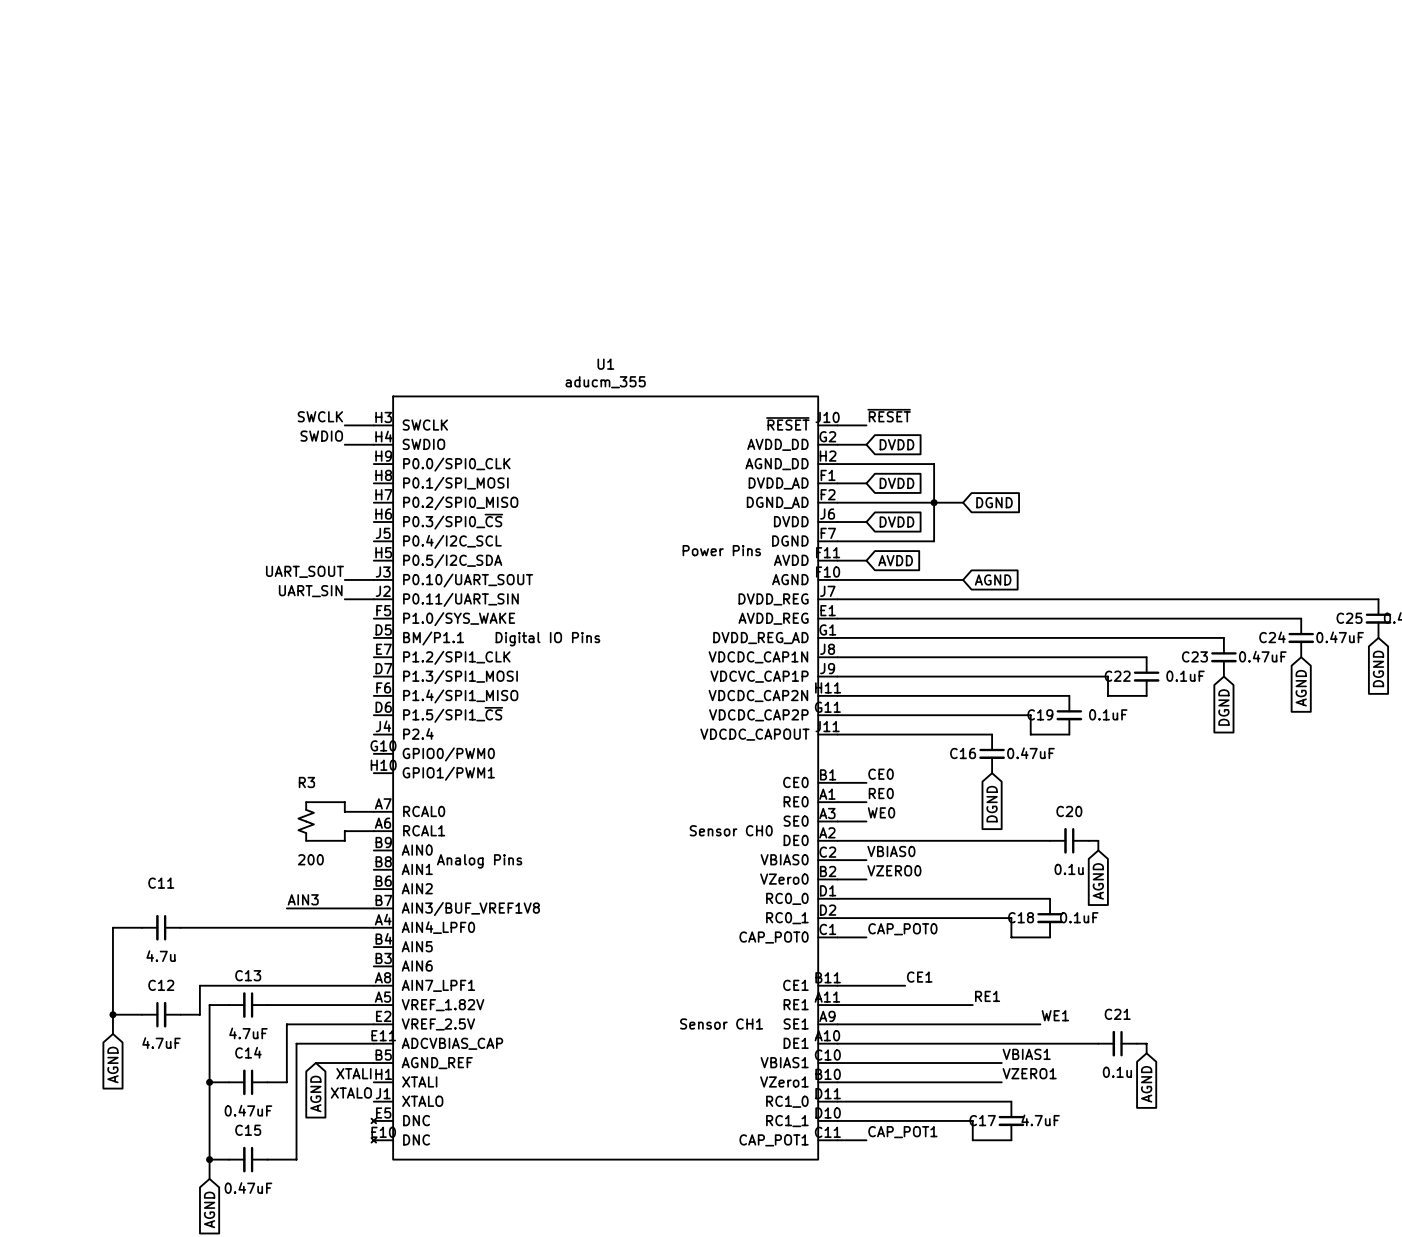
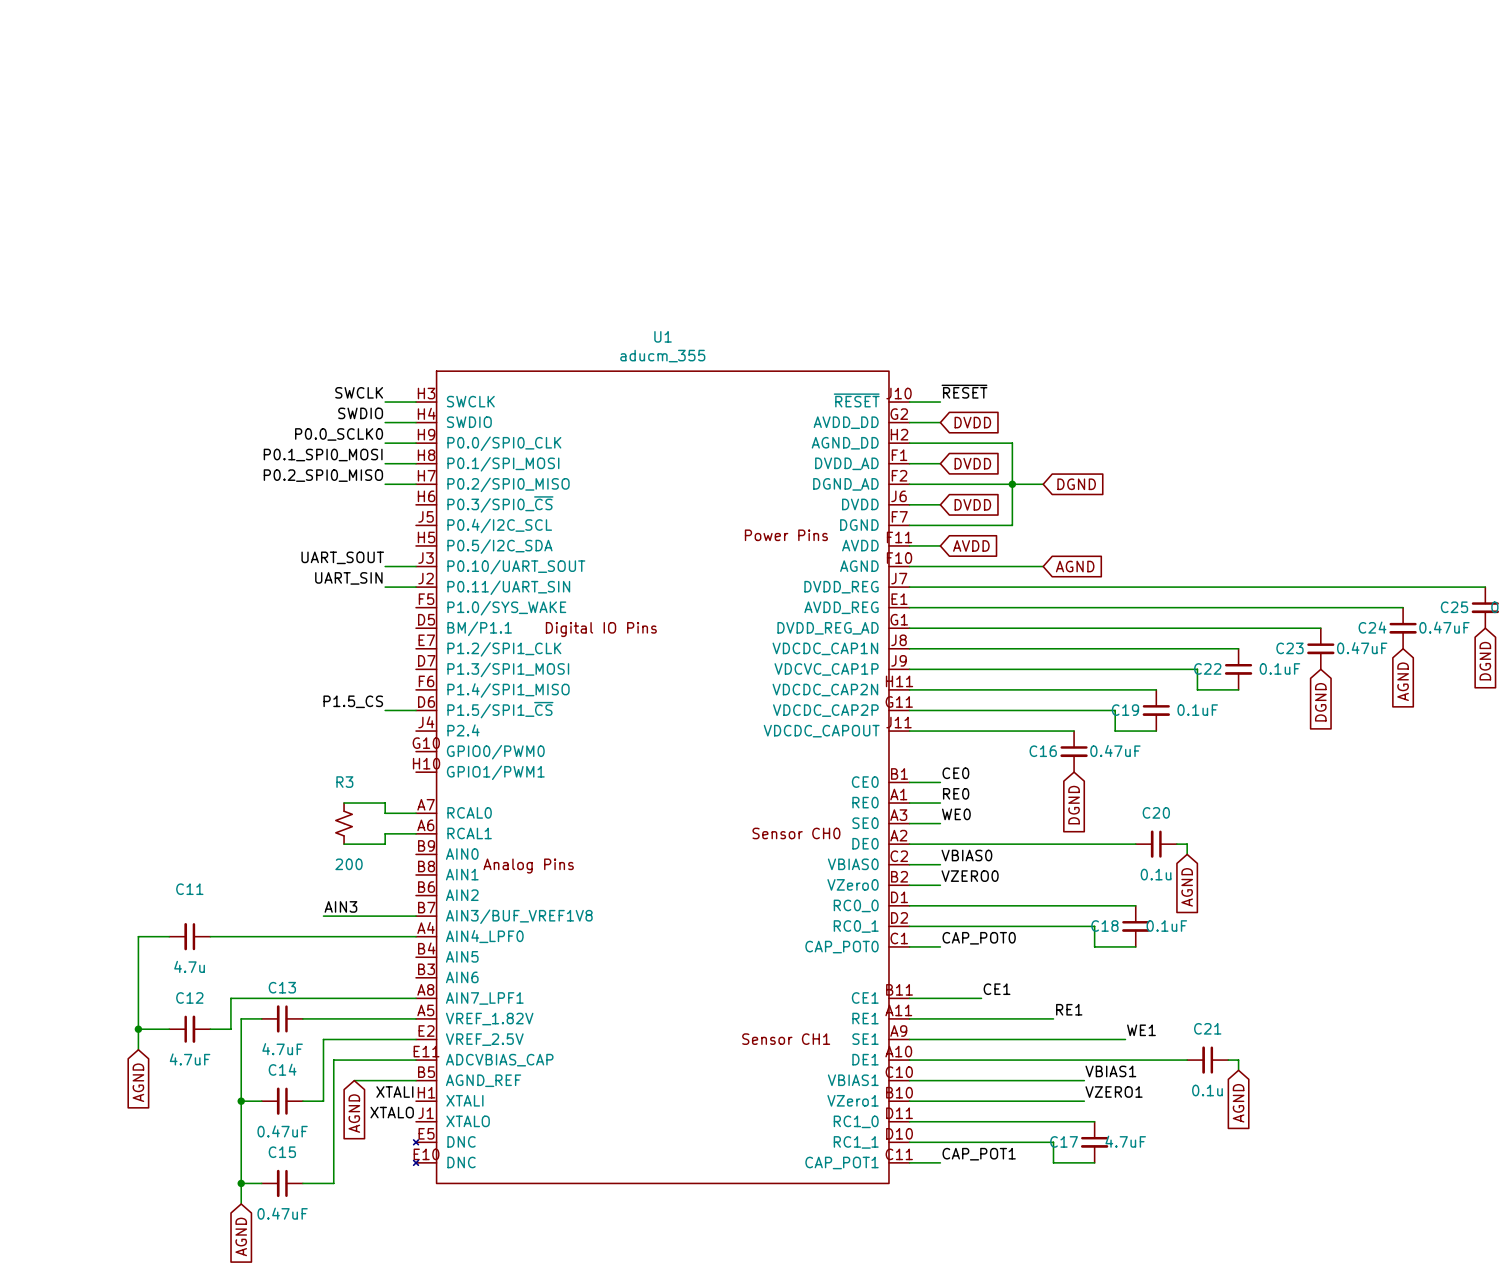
label: none -> P0.0_SCLK0 (339, 434)
wire: none -> (385, 443) (416, 443)
label: none -> P0.1_SPI0_MOSI (323, 455)
wire: none -> (385, 463) (416, 463)
label: none -> P0.2_SPI0_MISO (323, 475)
wire: none -> (385, 484) (416, 484)
label: none -> P1.5_CS (353, 701)
wire: none -> (385, 710) (416, 710)

